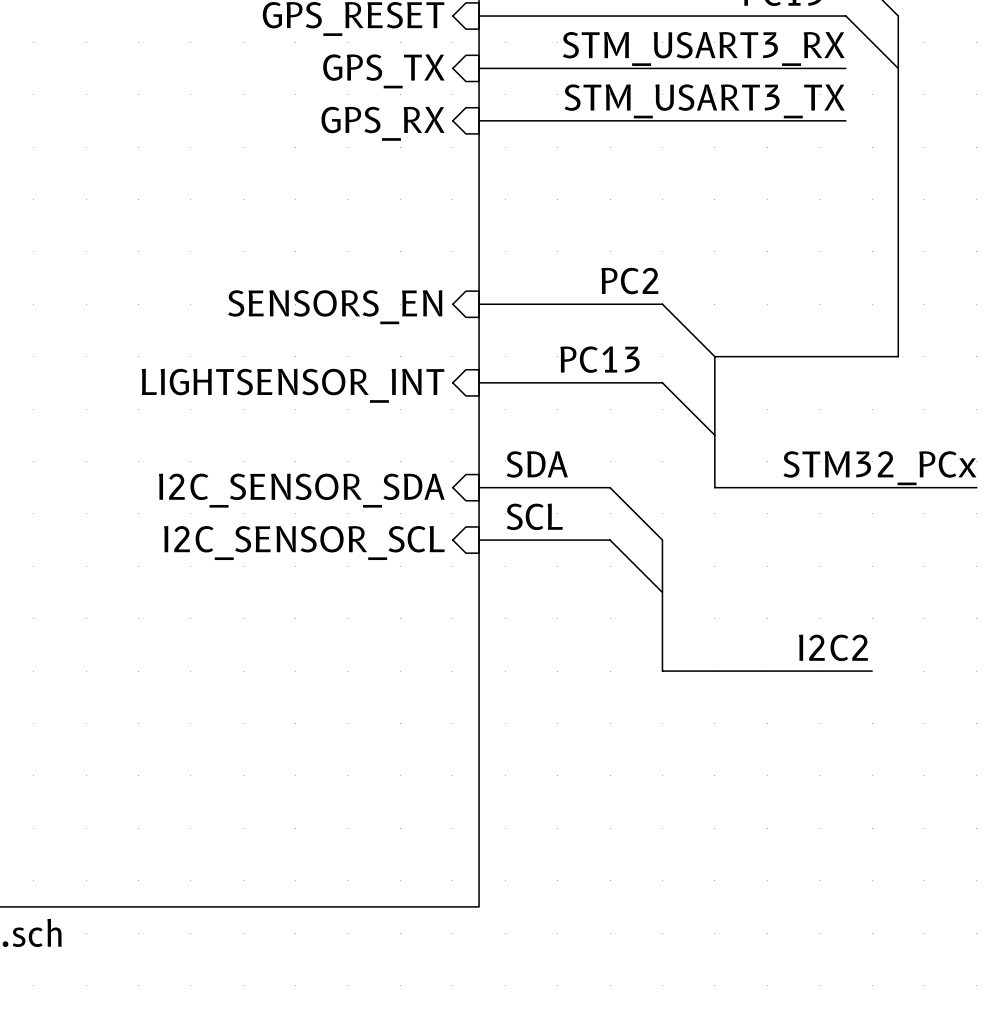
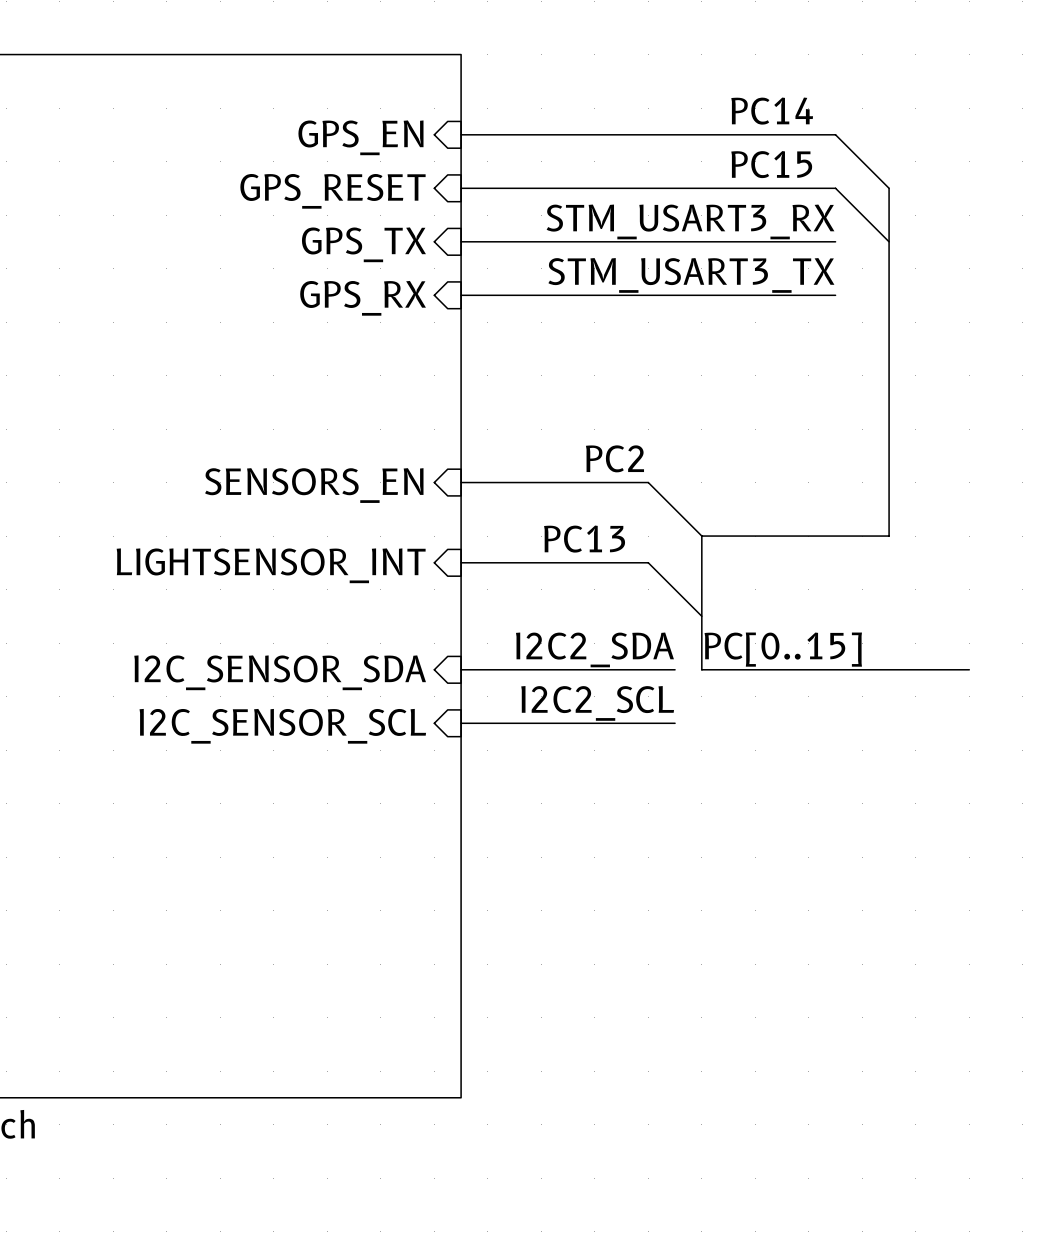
label: SDA (537, 464) -> none
label: none -> PC[0..15] (783, 649)
label: none -> I2C2_SDA (594, 649)
label: STM32_PCx (879, 468) -> none
wire: (610, 487) (662, 540) -> (594, 669) (675, 669)
label: SCL (534, 516) -> none
label: none -> I2C2_SCL (597, 703)
wire: (610, 540) (662, 592) -> (594, 723) (675, 723)
bus: (662, 540) (662, 671) (872, 671) -> none
label: I2C2 (833, 647) -> none

